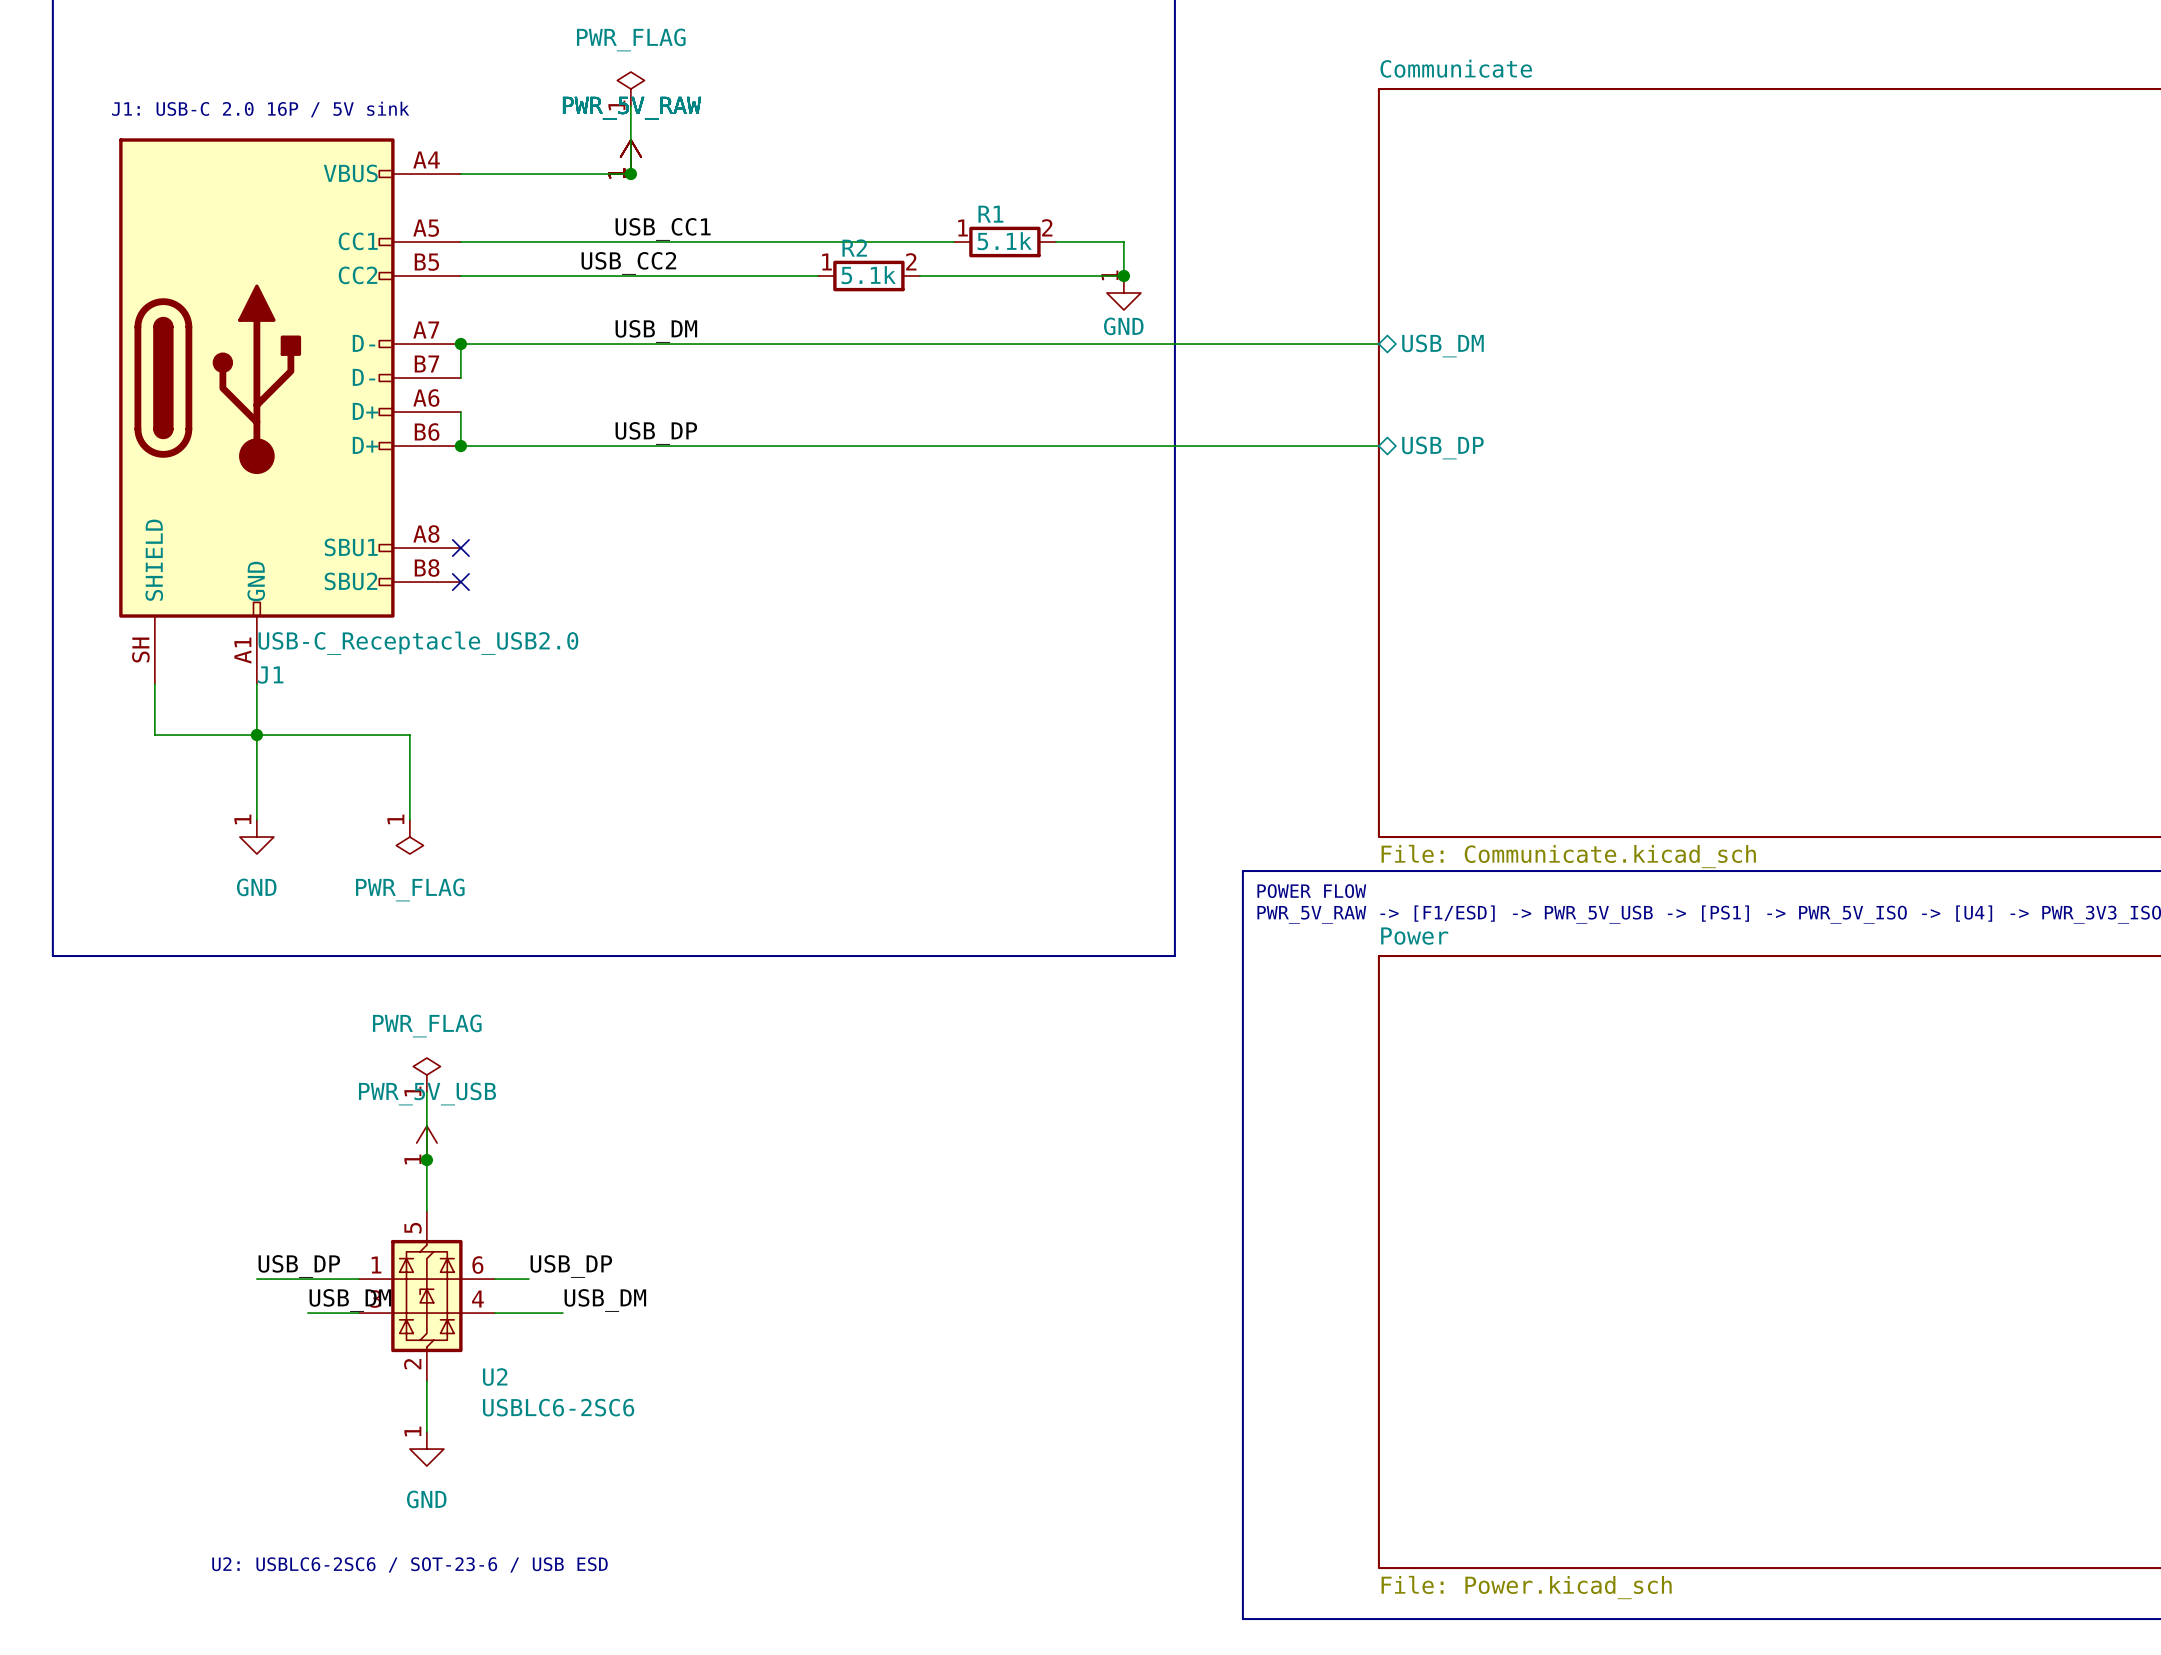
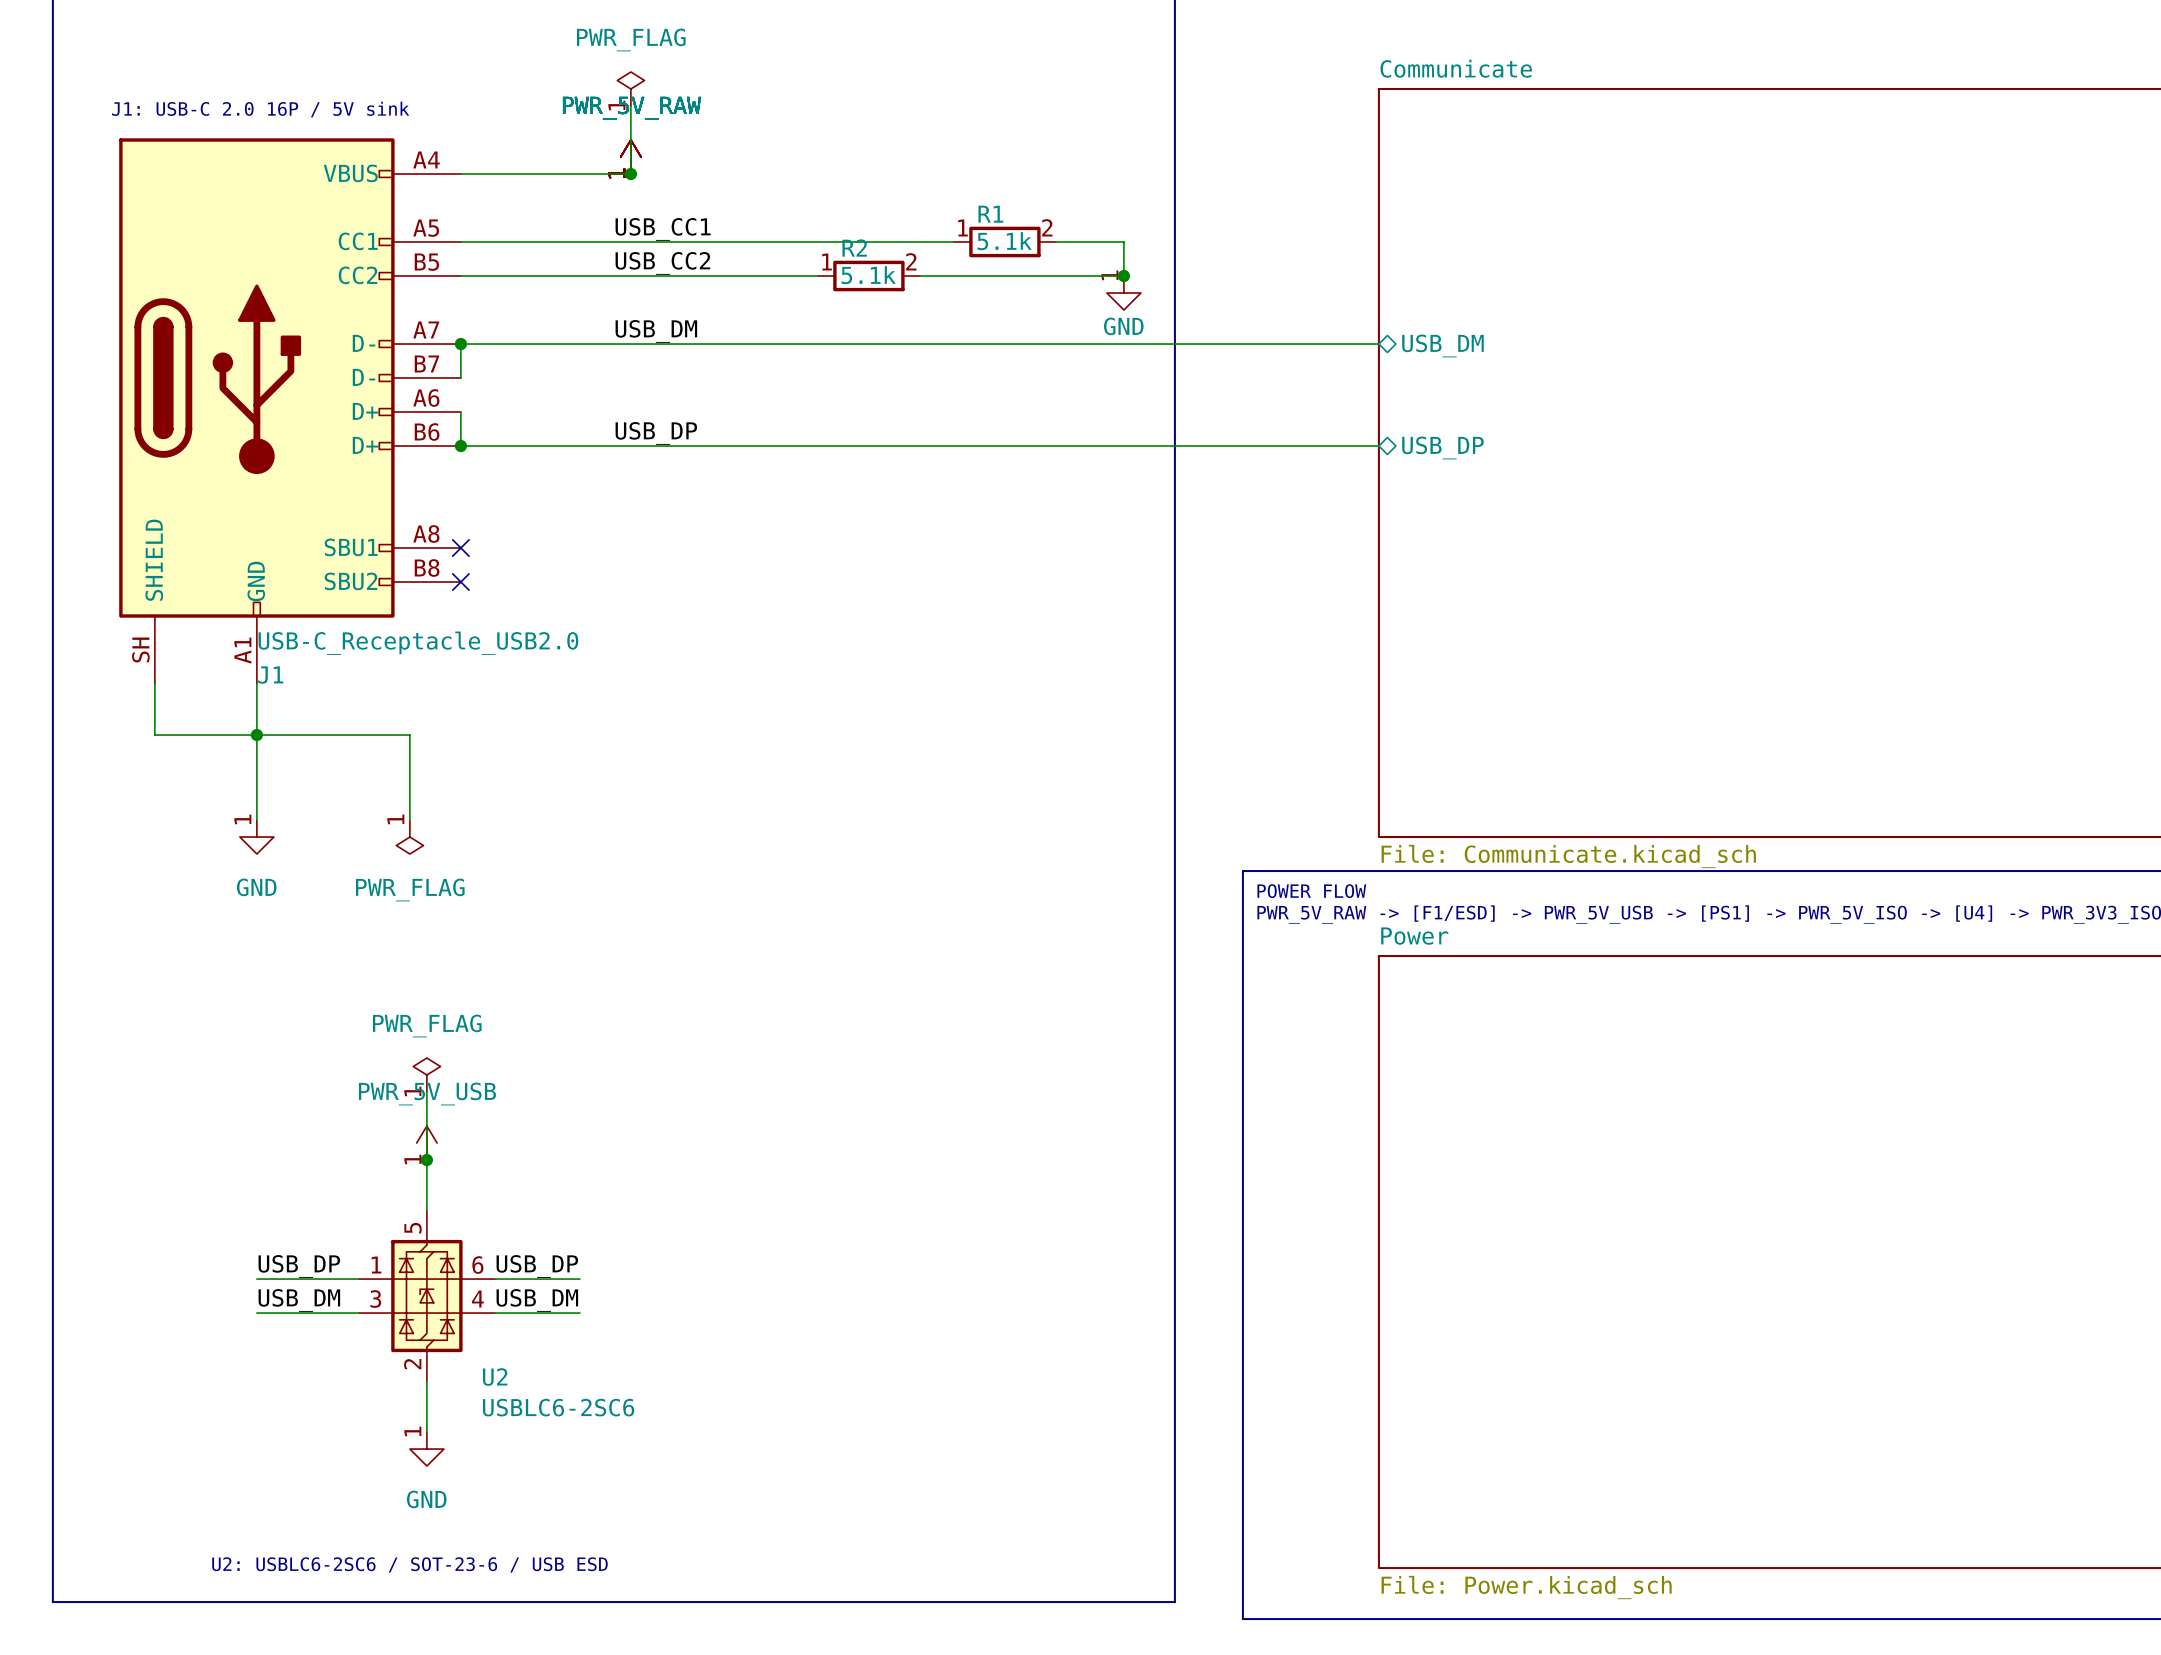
label position: USB_CC2 (628, 263) -> USB_CC2 (662, 263)
line: (52, 956) (1174, 956) -> (52, 956) (52, 1602) (1174, 1602) (1174, 956)
label position: USB_DP (571, 1266) -> USB_DP (537, 1266)
wire: none -> (528, 1279) (579, 1279)
label position: USB_DM (350, 1300) -> USB_DM (299, 1300)
label position: USB_DM (605, 1300) -> USB_DM (537, 1300)
wire: none -> (256, 1313) (307, 1313)
wire: none -> (562, 1313) (579, 1313)

